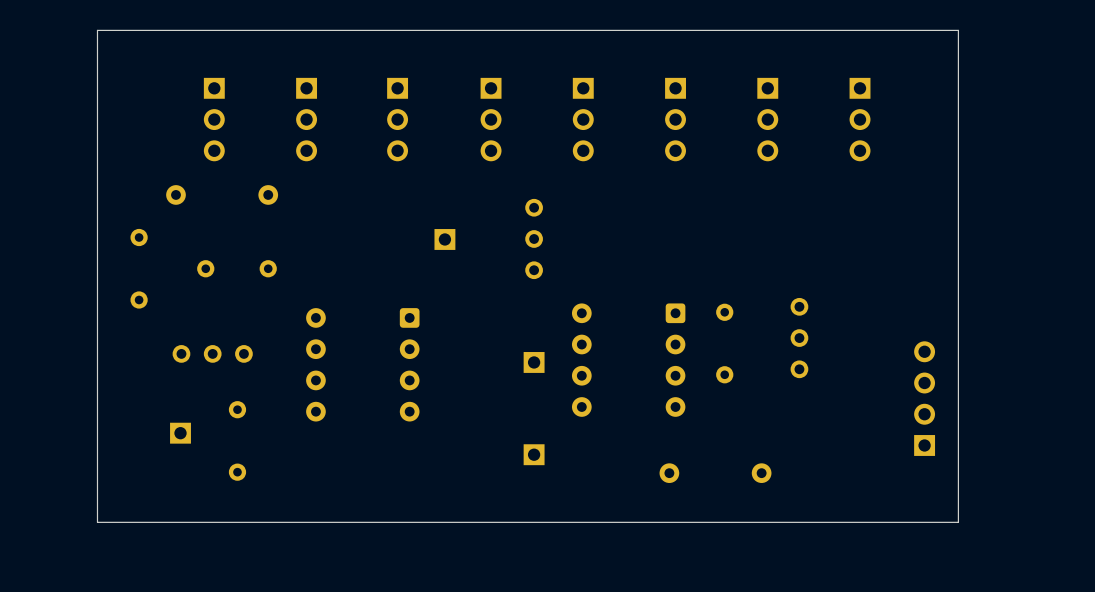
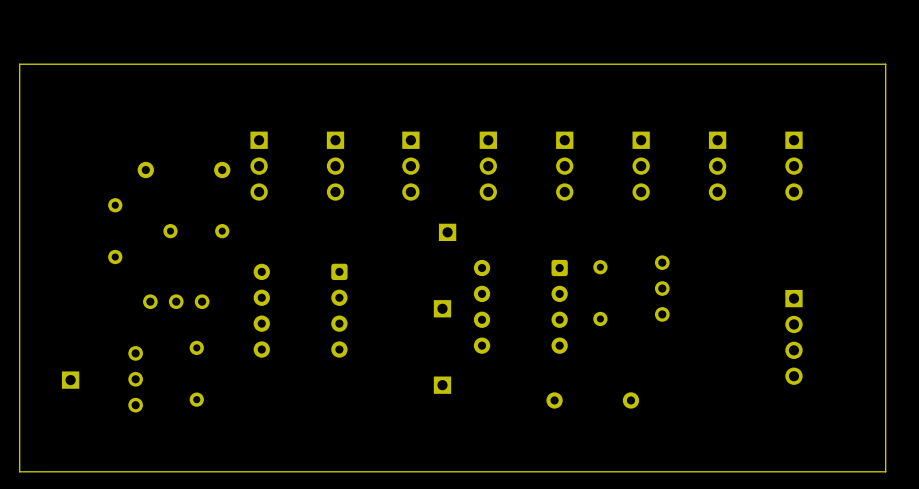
board edge: (958, 30) (97, 30) (97, 522) (958, 522) (958, 30) -> (885, 64) (885, 471) (19, 471) (19, 64) (885, 64)
part: (214, 119) -> none
part: (306, 119) -> none
part: (397, 119) -> none
part: (491, 119) -> none
part: (583, 119) -> none
part: (675, 119) -> none
part: (767, 119) -> none
part: (860, 119) -> none
part: none -> (259, 166)
part: none -> (335, 166)
part: none -> (410, 166)
part: none -> (488, 166)
part: none -> (564, 166)
part: none -> (641, 166)
part: none -> (717, 166)
part: none -> (793, 166)
part: (534, 238) -> none
part position: (444, 239) -> (447, 232)
part rotation: 0° (924, 398) -> 180° (793, 337)
part position: (180, 433) -> (70, 380)
part: none -> (135, 379)

